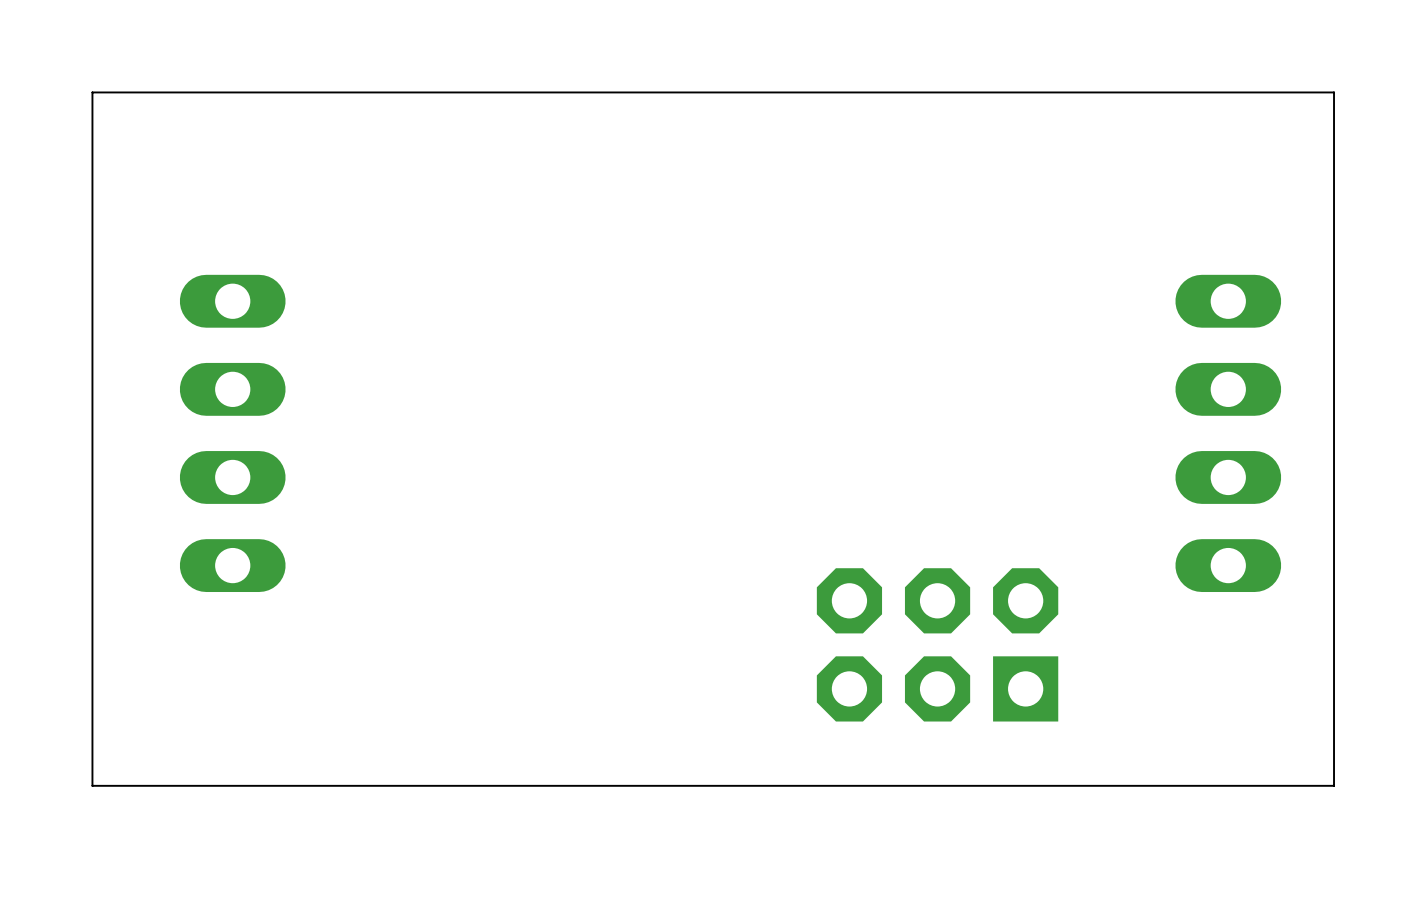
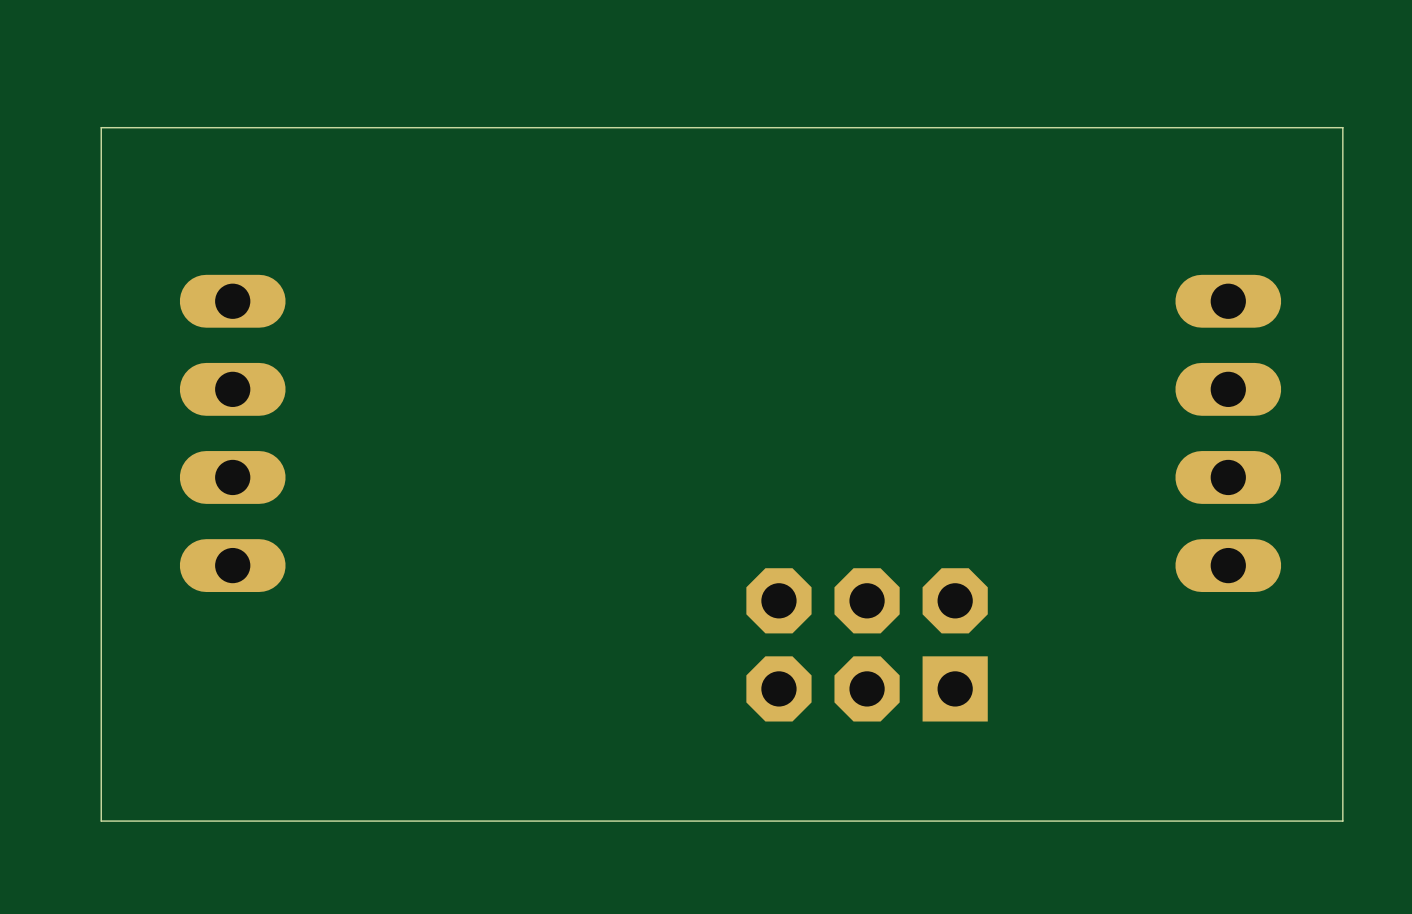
board edge: (1334, 92) (92, 92) (92, 785) (1334, 785) (1334, 92) -> (1342, 127) (101, 127) (101, 821) (1342, 821) (1342, 127)
part position: (937, 644) -> (867, 644)

